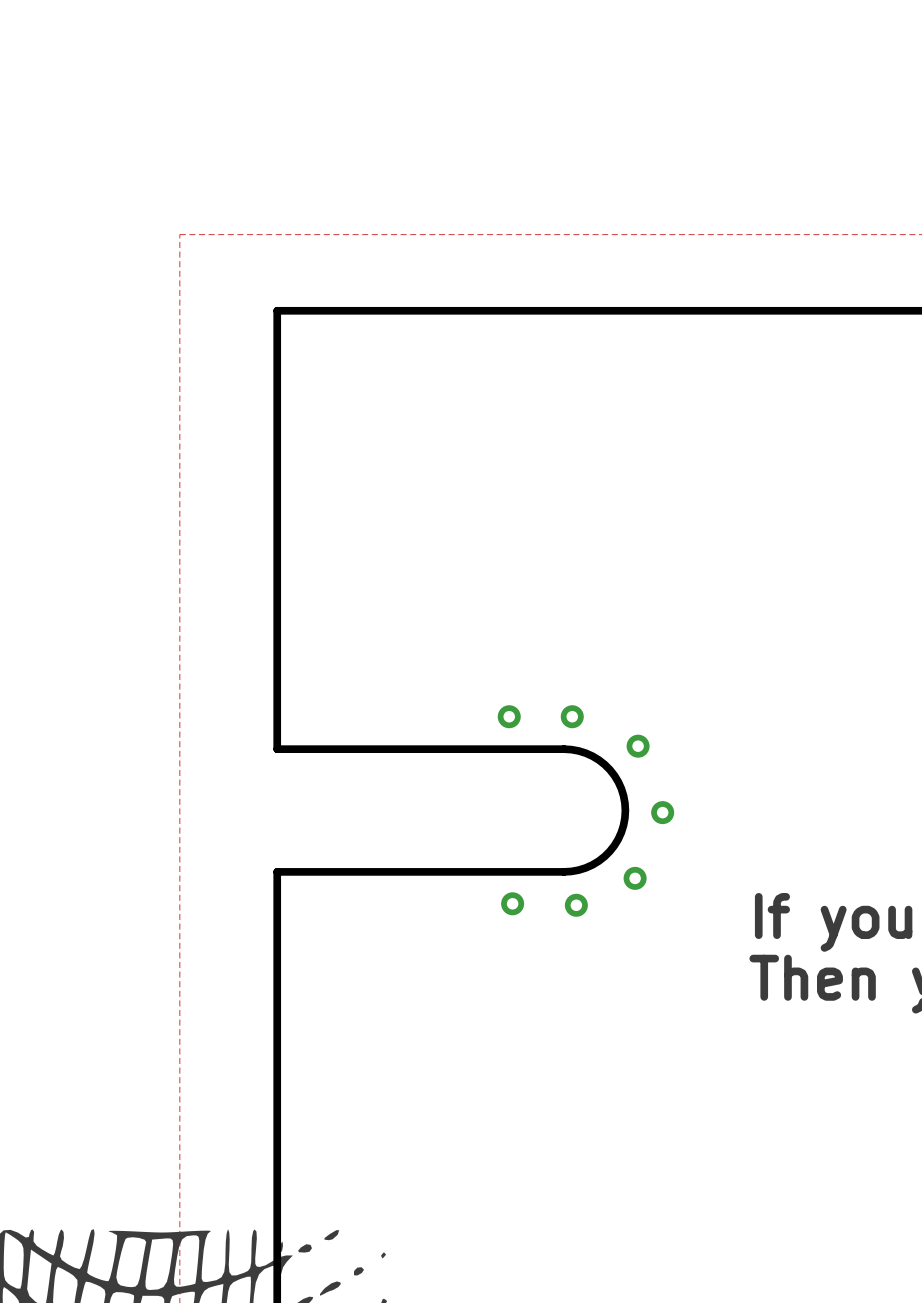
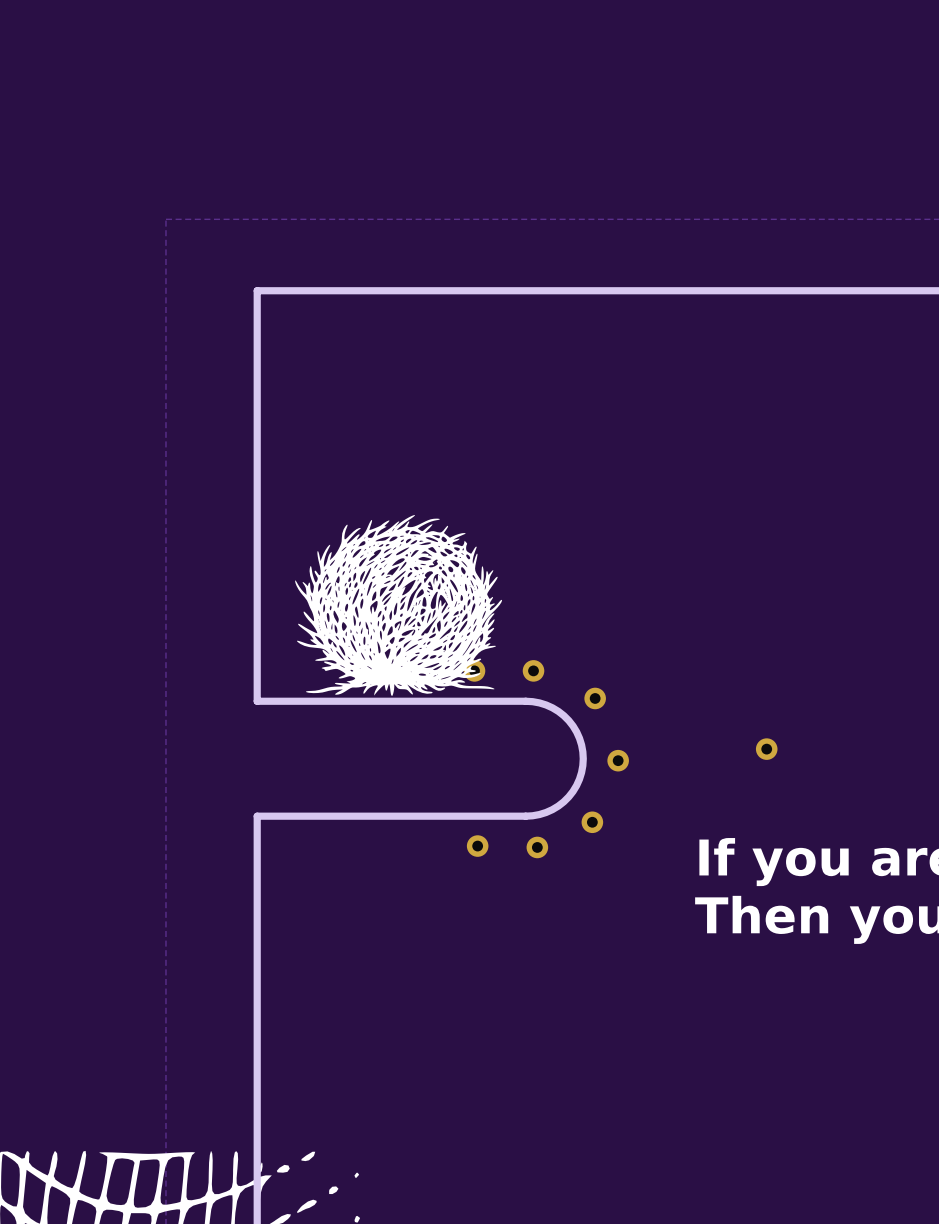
drawing: none -> [295, 515, 502, 696]
via: none -> (766, 749)

